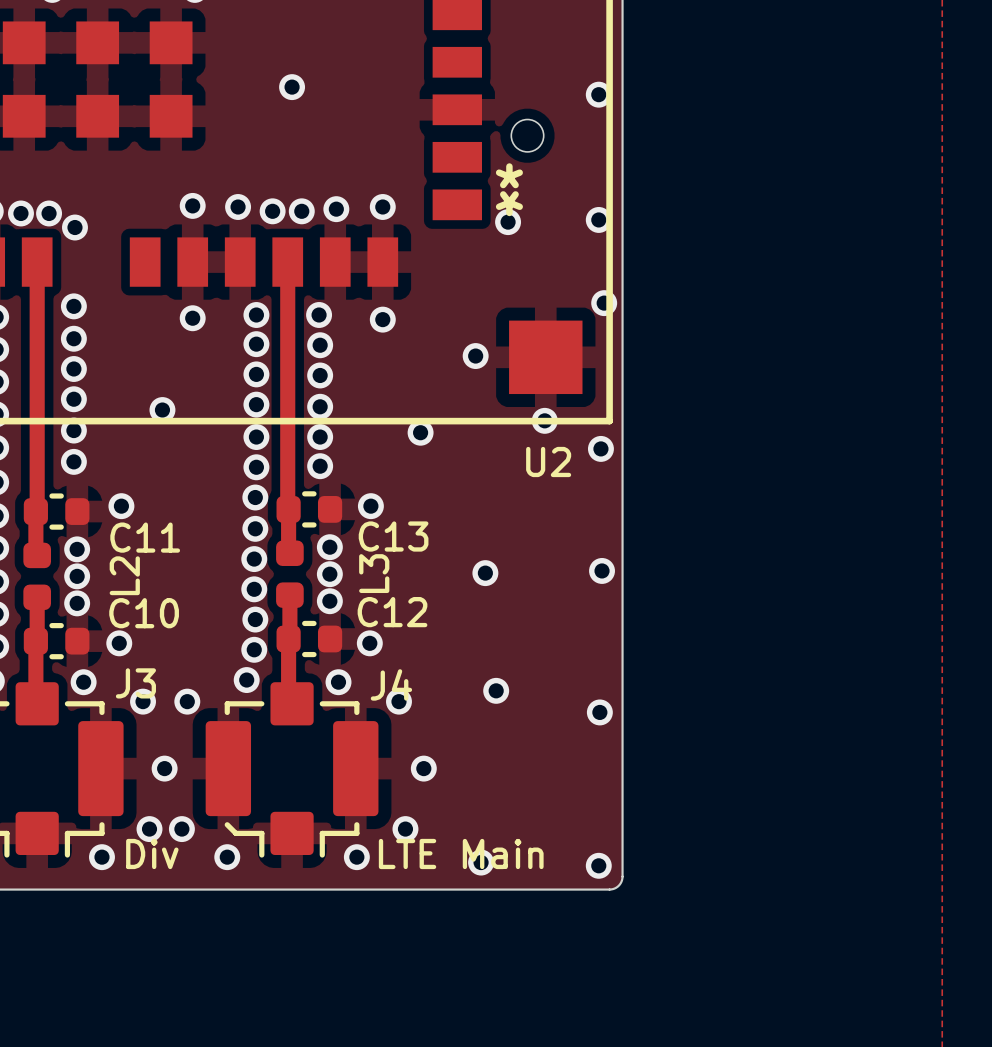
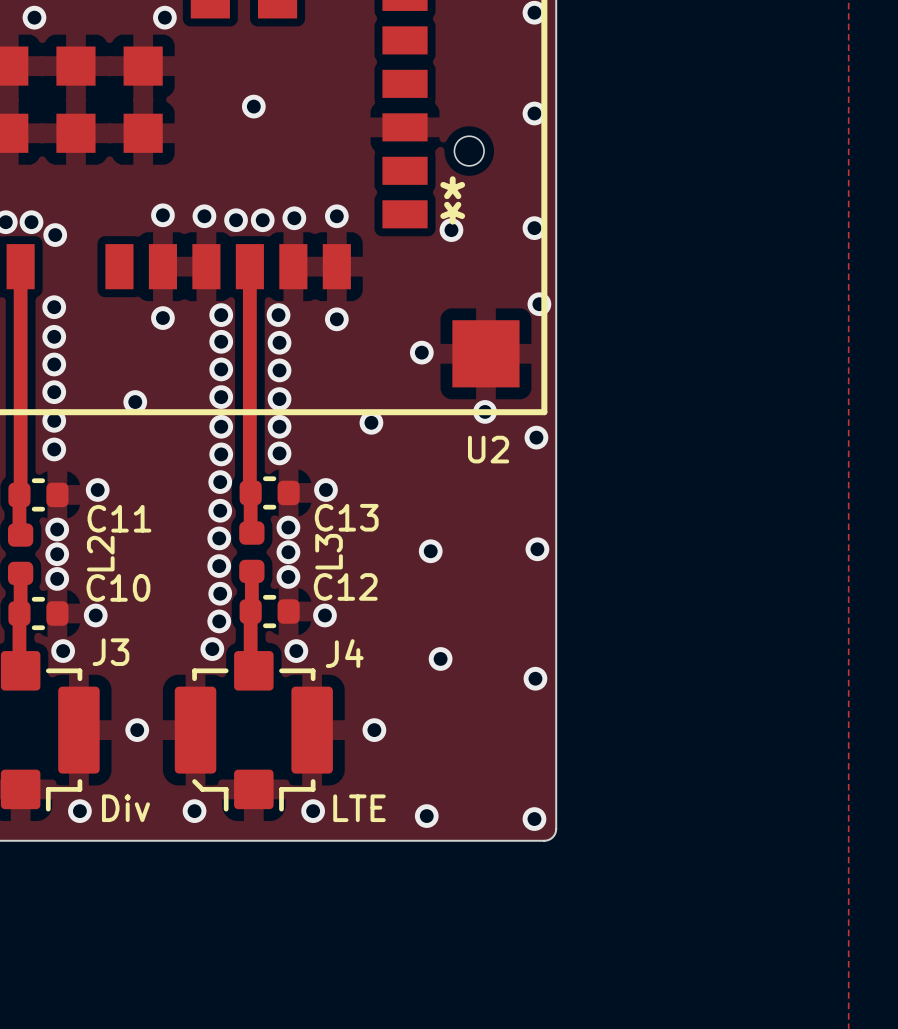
via: (143, 701) -> none
via: (187, 701) -> none
via: (398, 701) -> none
via: (149, 829) -> none
via: (181, 829) -> none
via: (405, 829) -> none
text: LTE Main (461, 853) -> LTE (359, 808)

